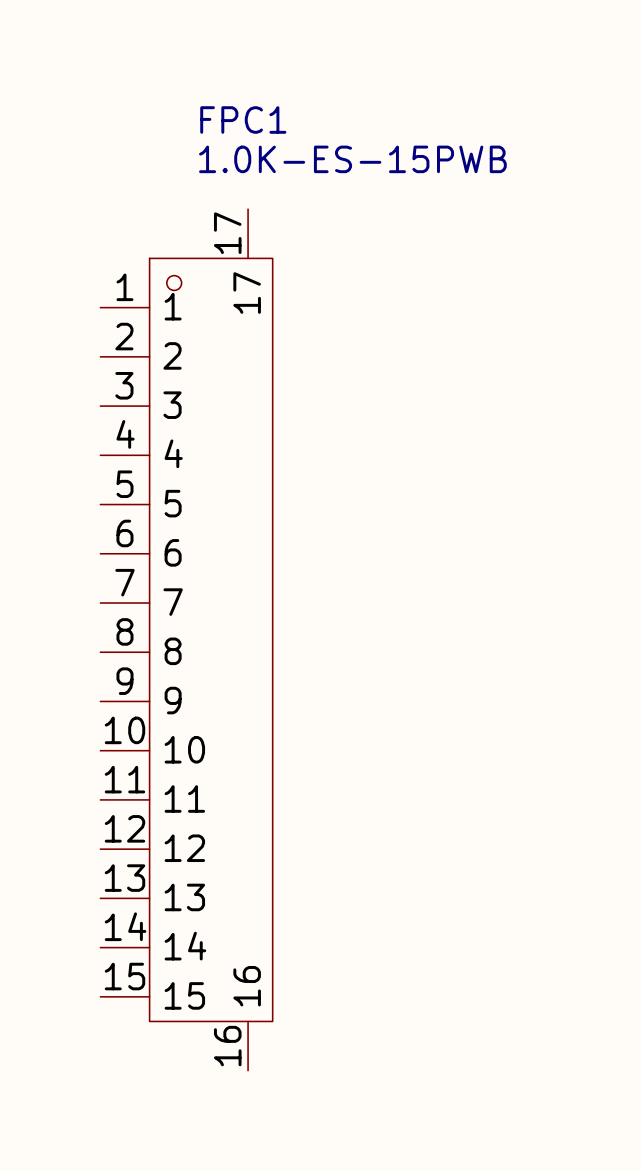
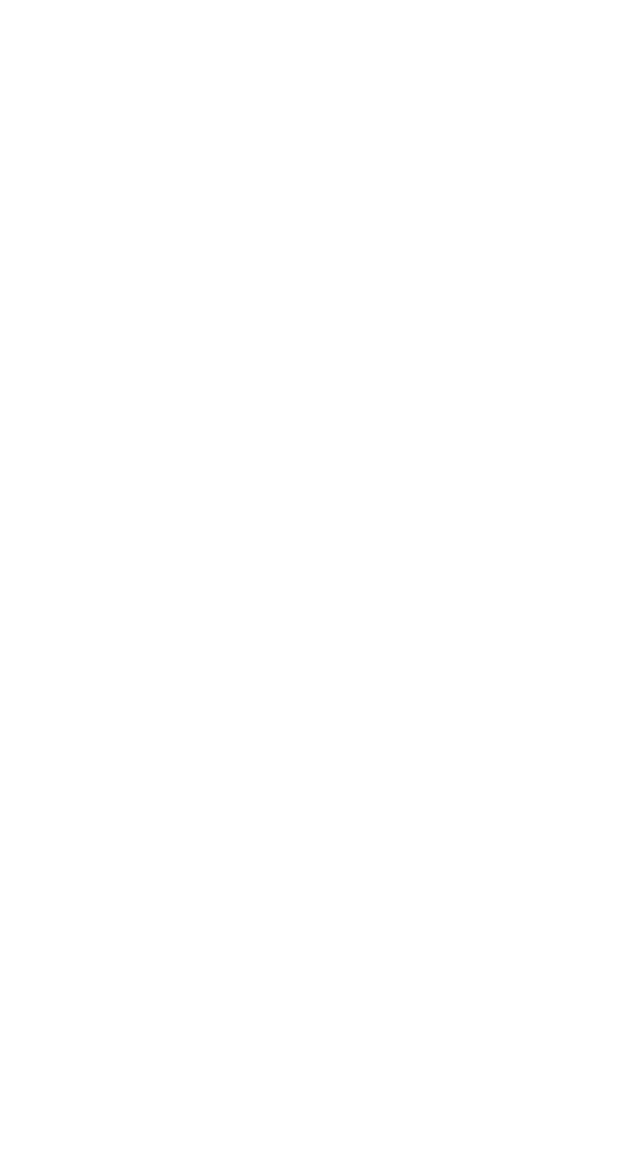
FPC1: 1.0K-ES-15PWB (186, 639) -> none

